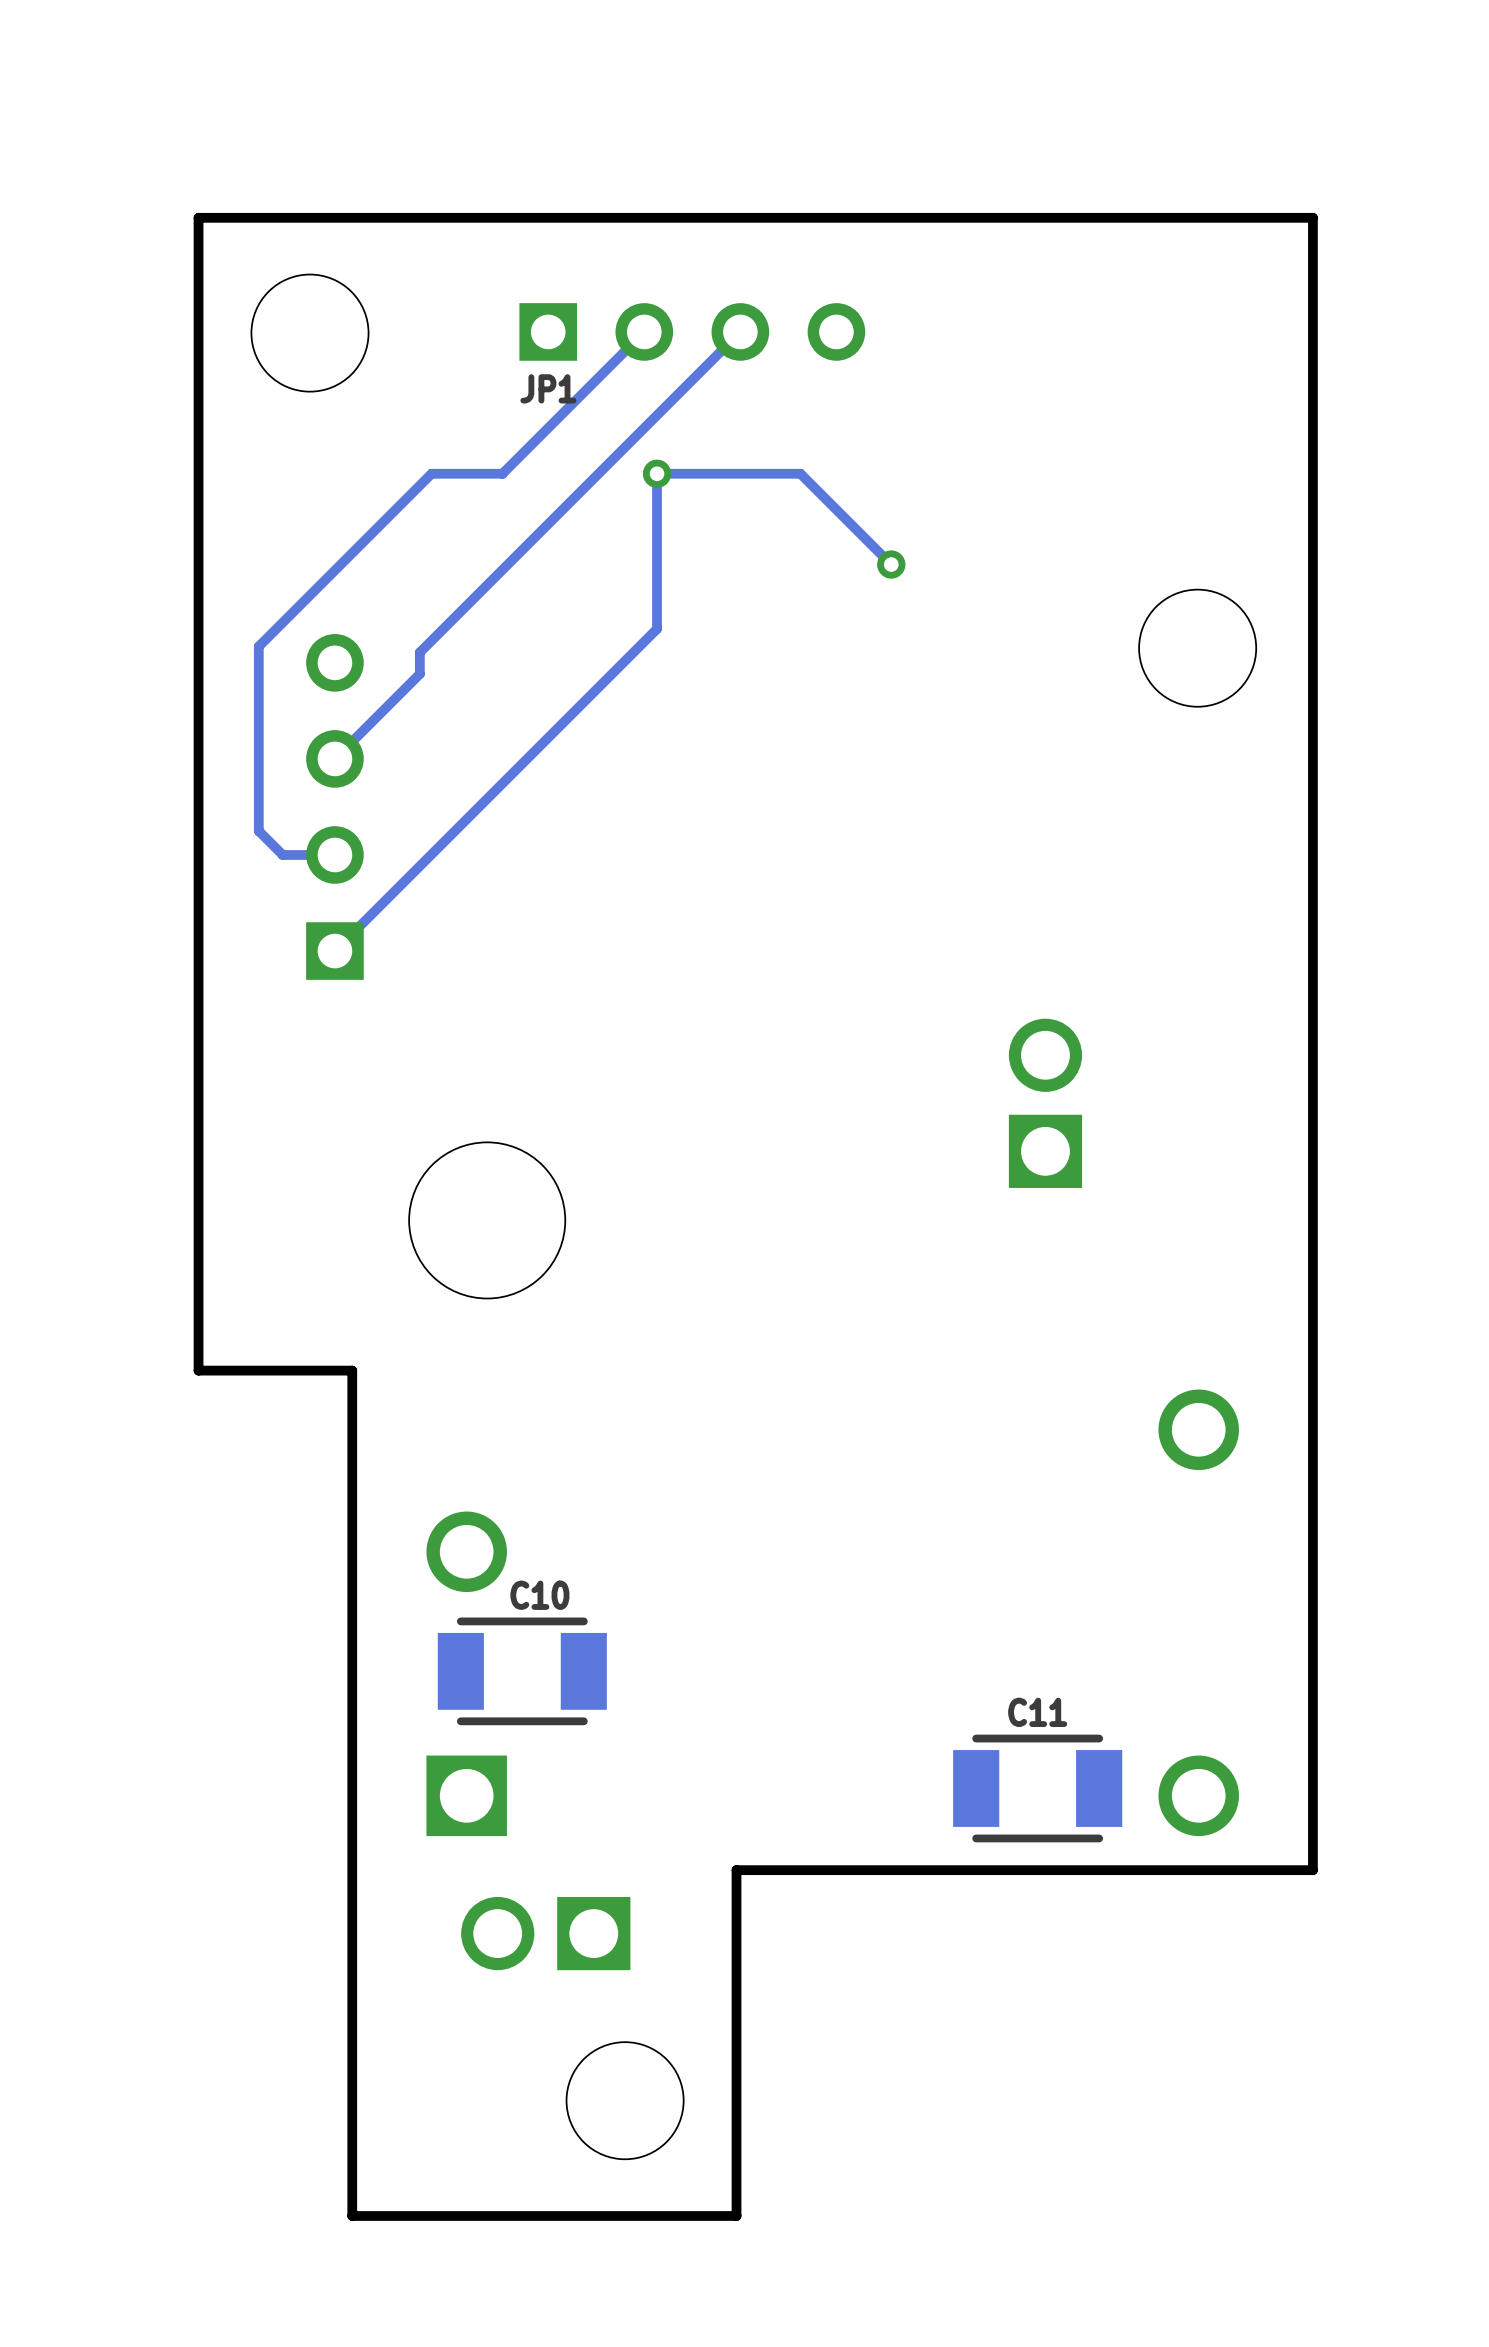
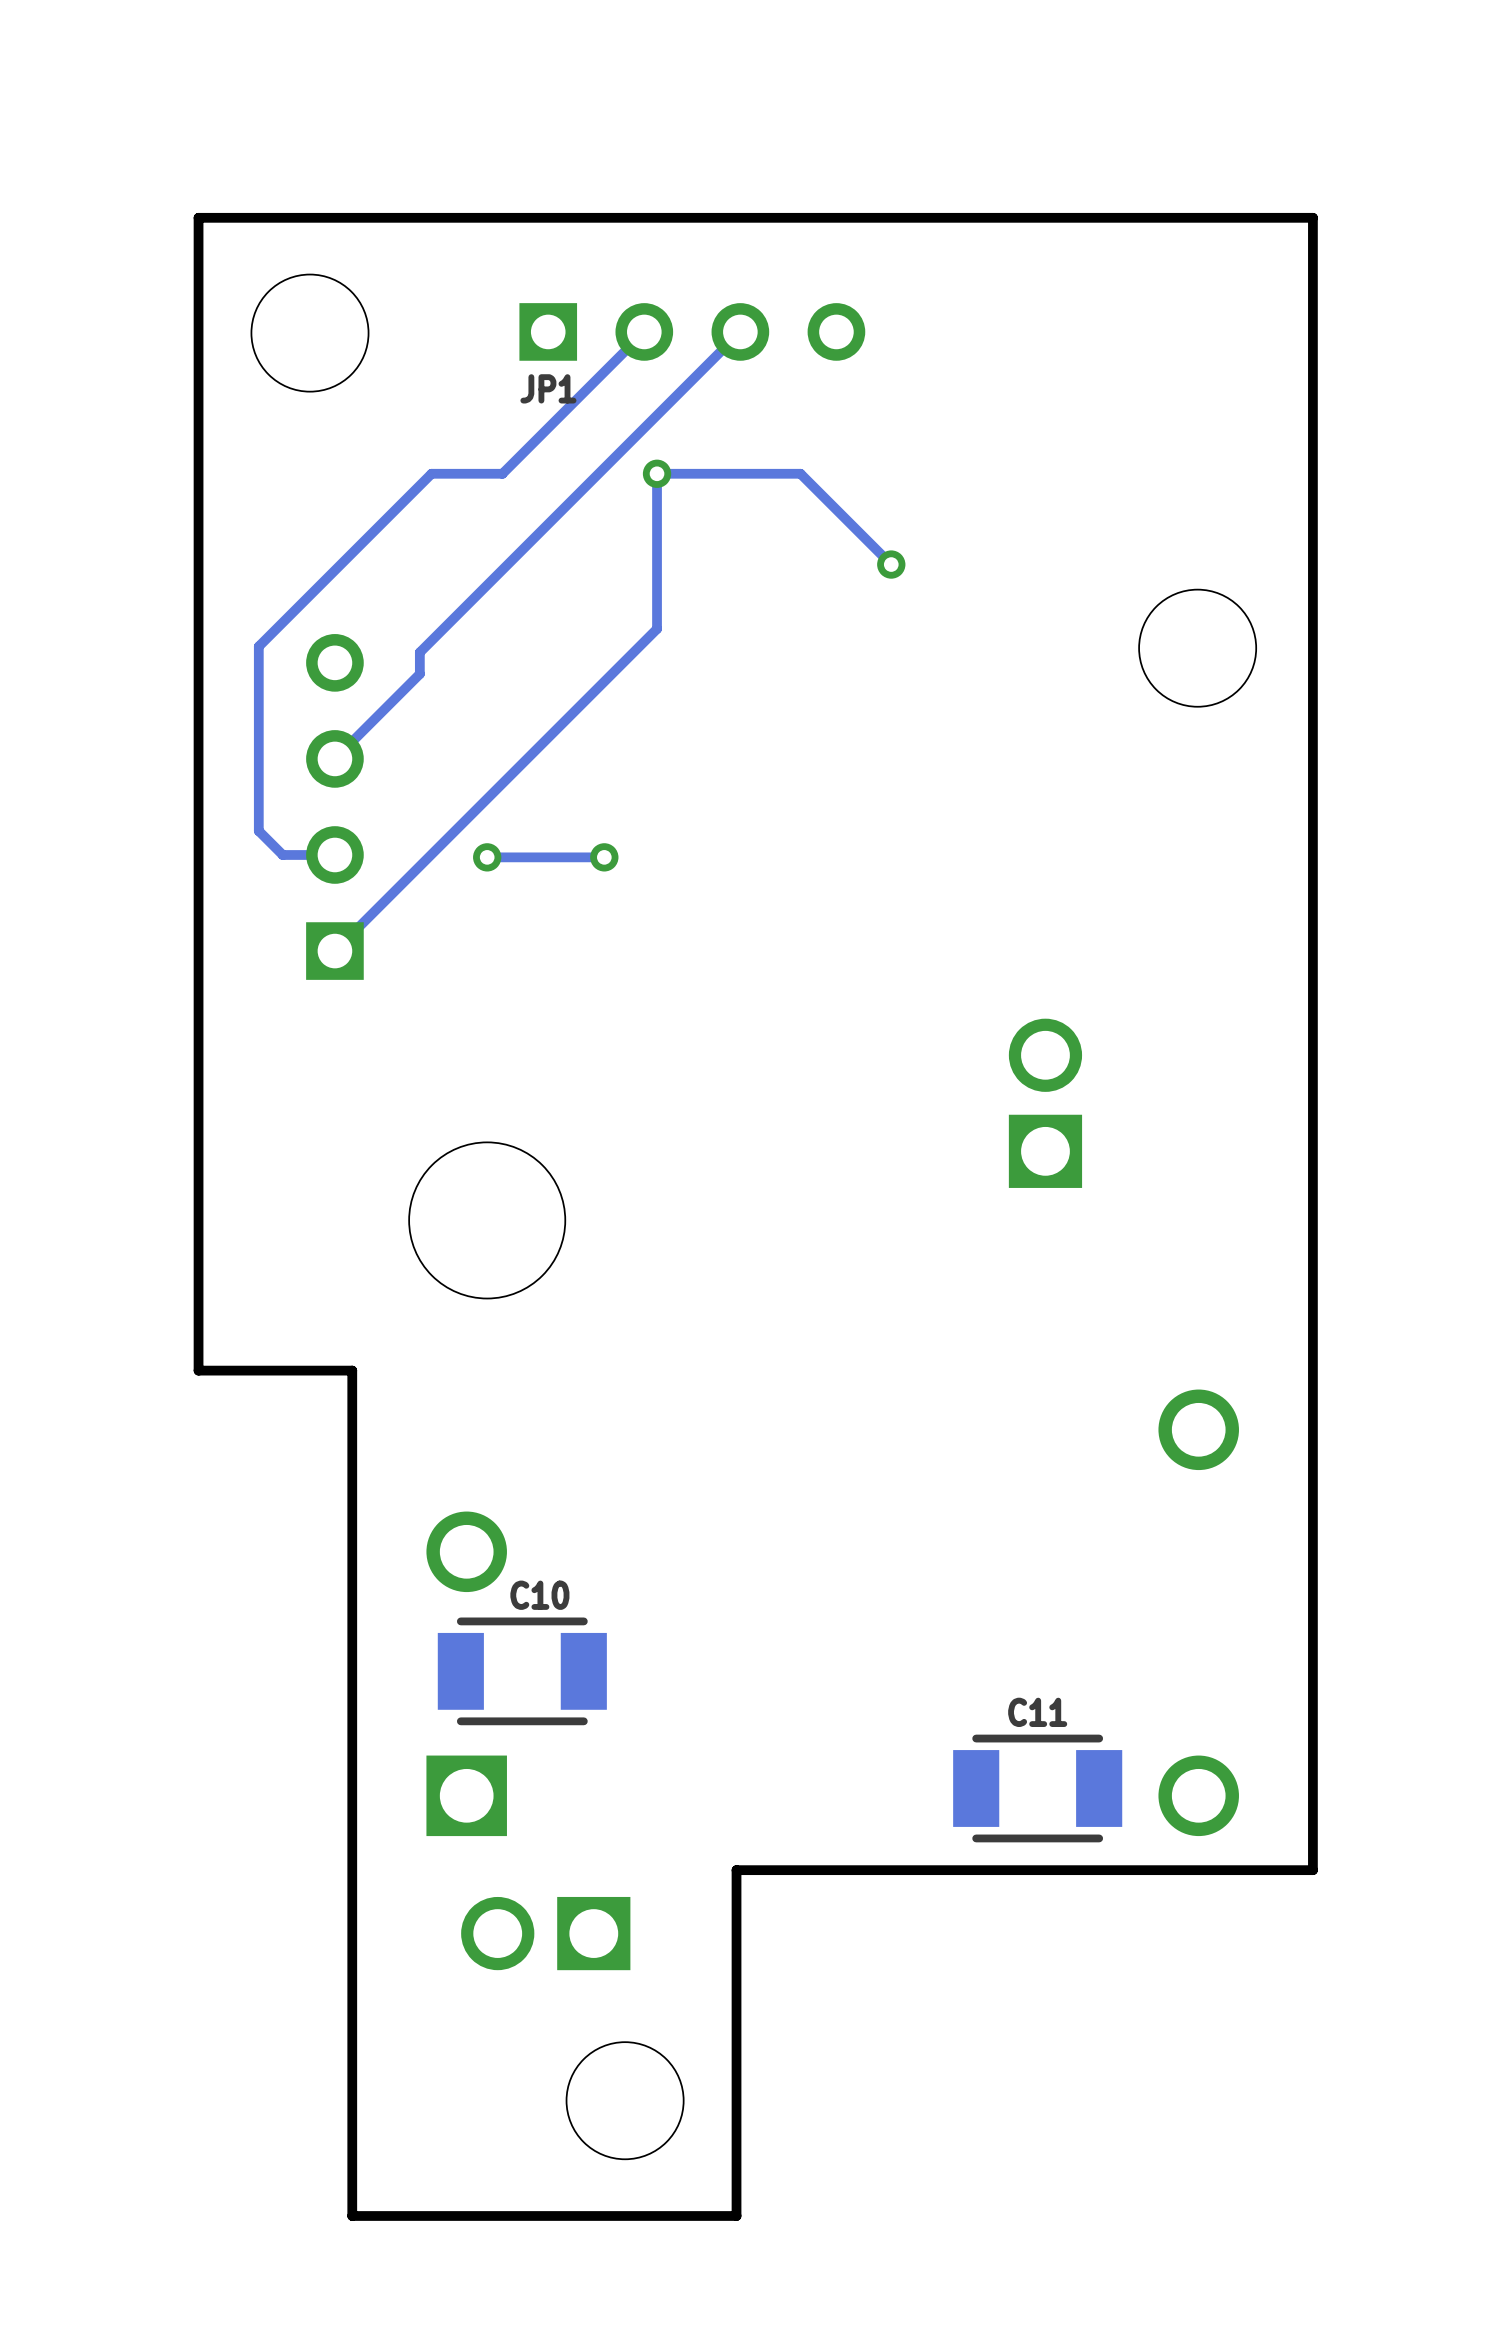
via: none -> (487, 857)
track: none -> (604, 857) (487, 857)
via: none -> (604, 857)

